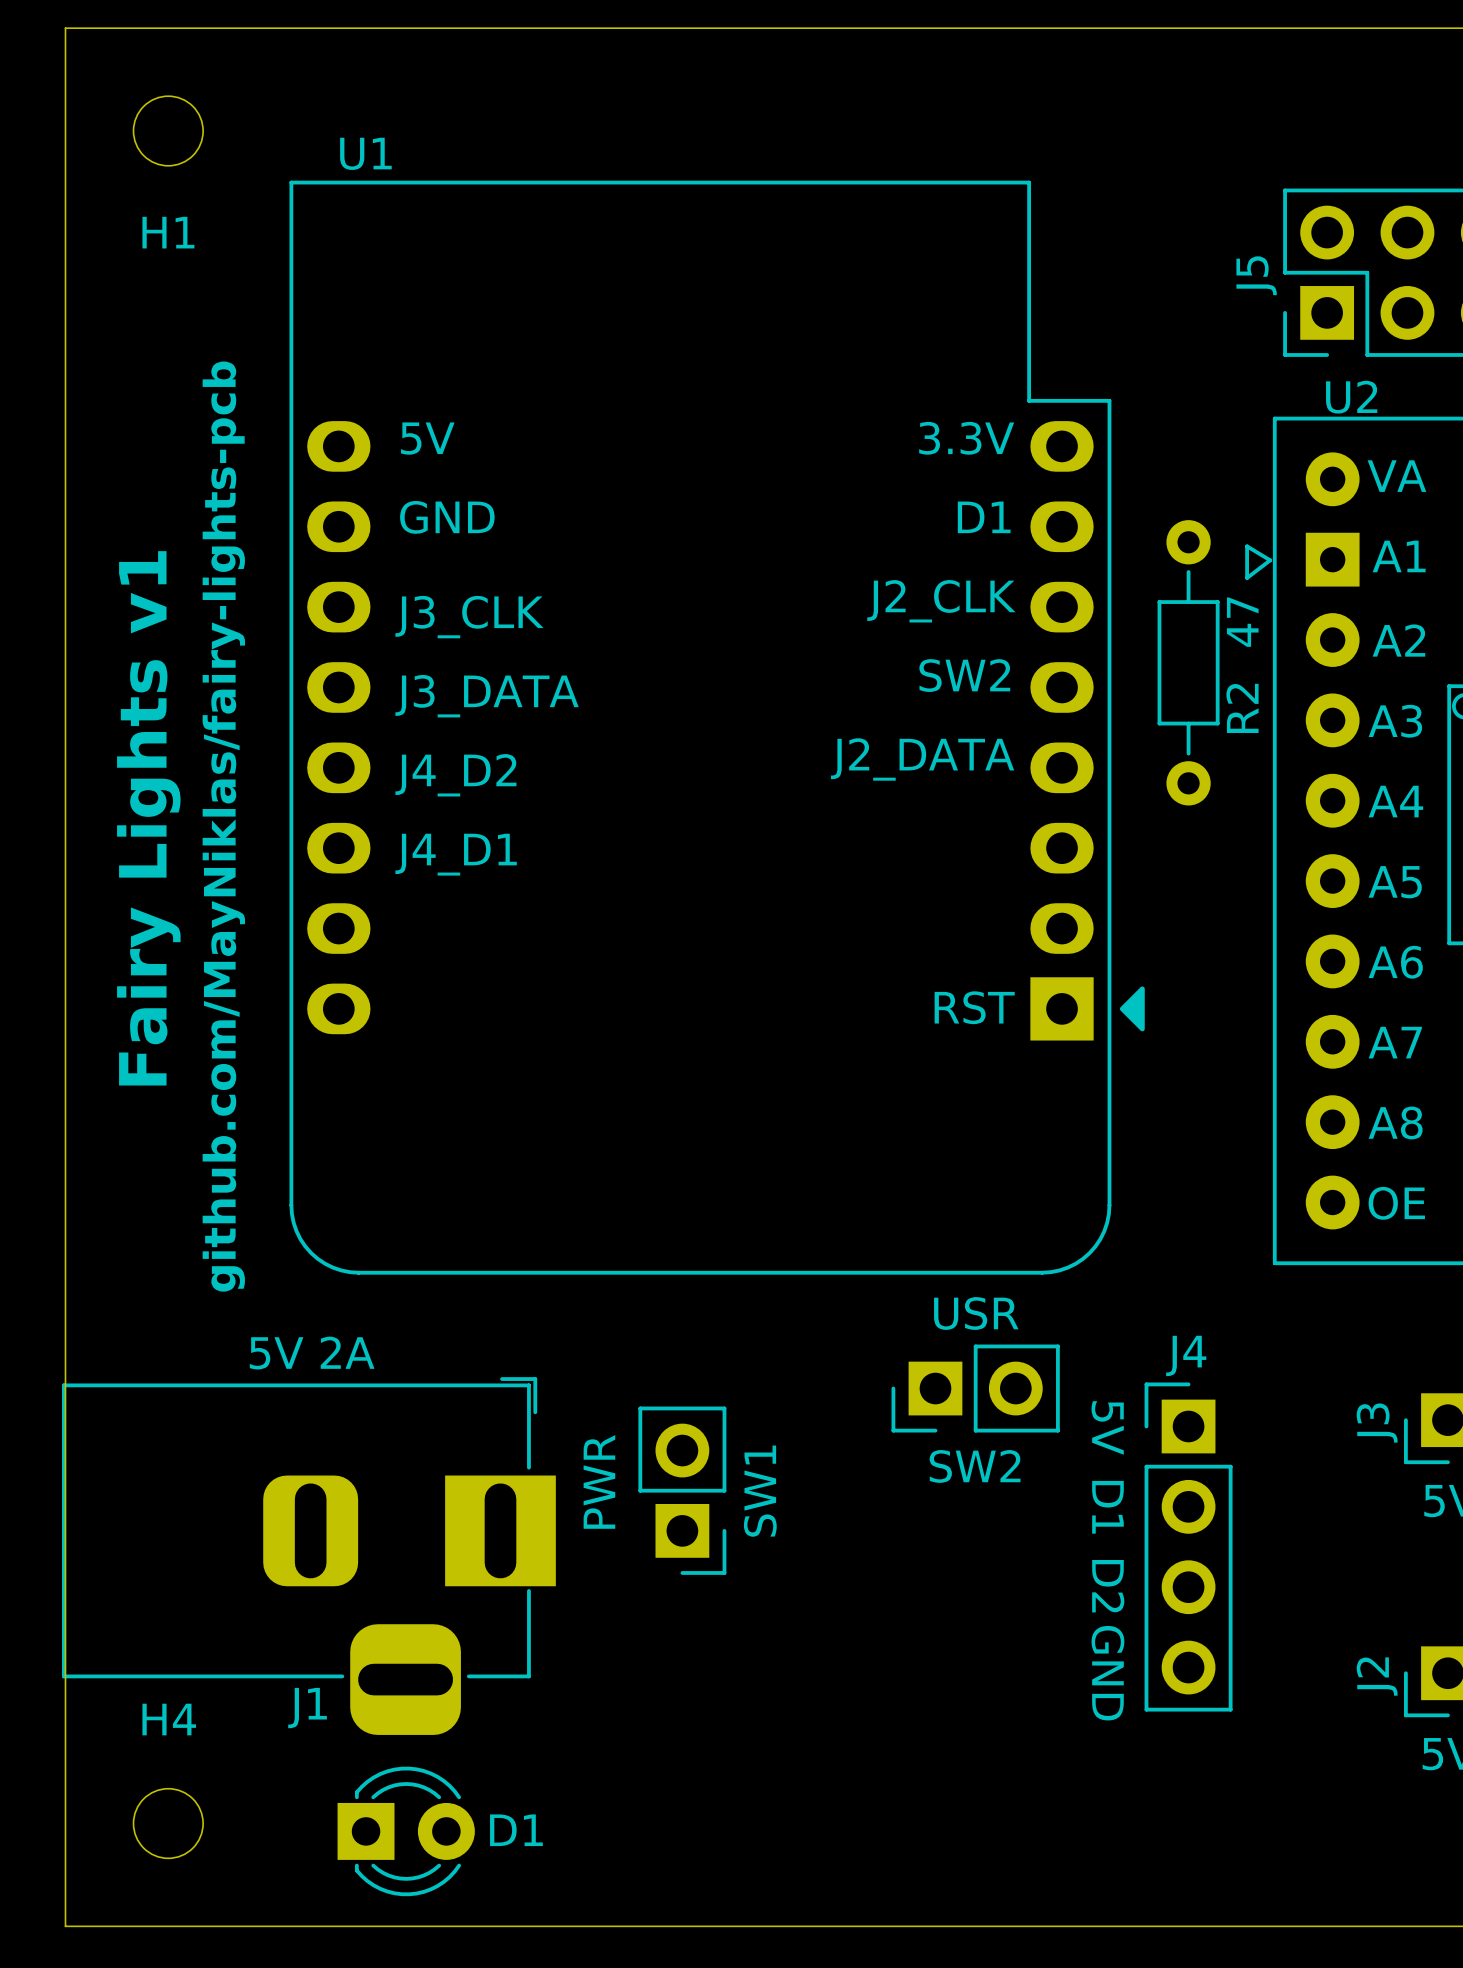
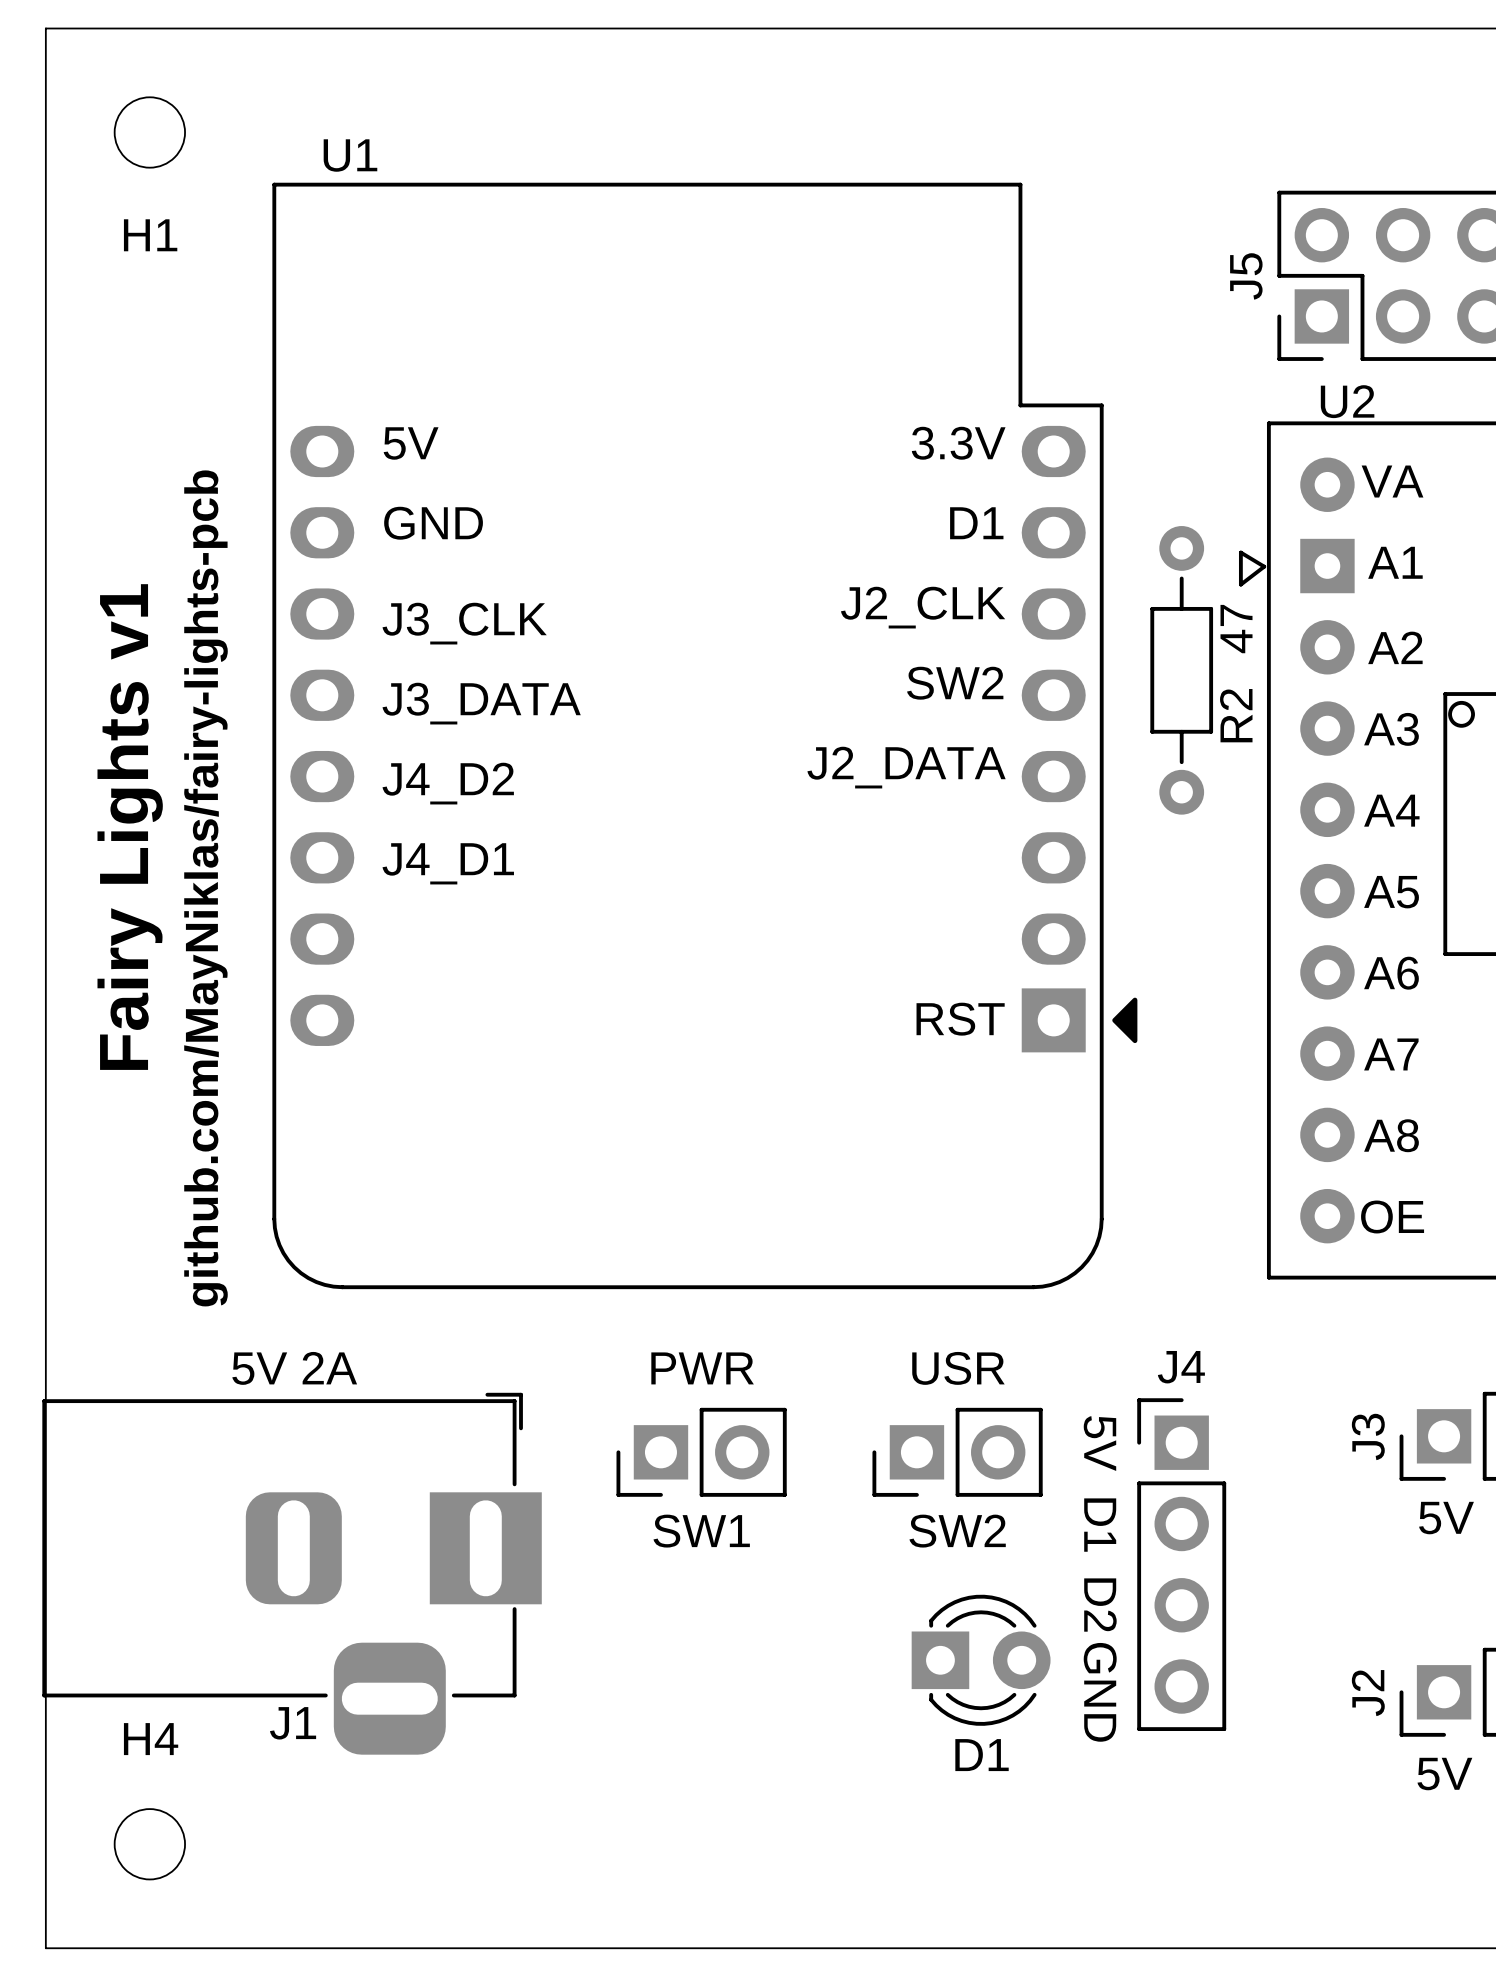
text position: USR (976, 1313) -> USR (958, 1368)
SW2 position: (975, 1388) -> (957, 1452)
text rotation: 0° (599, 1481) -> 90° clockwise (702, 1368)
text position: PWR (599, 1481) -> PWR (702, 1368)
SW1 rotation: 0° (682, 1490) -> 90° clockwise (701, 1452)
D1 name position: D1 (516, 1830) -> D1 (982, 1755)
D1 position: (406, 1831) -> (981, 1660)

